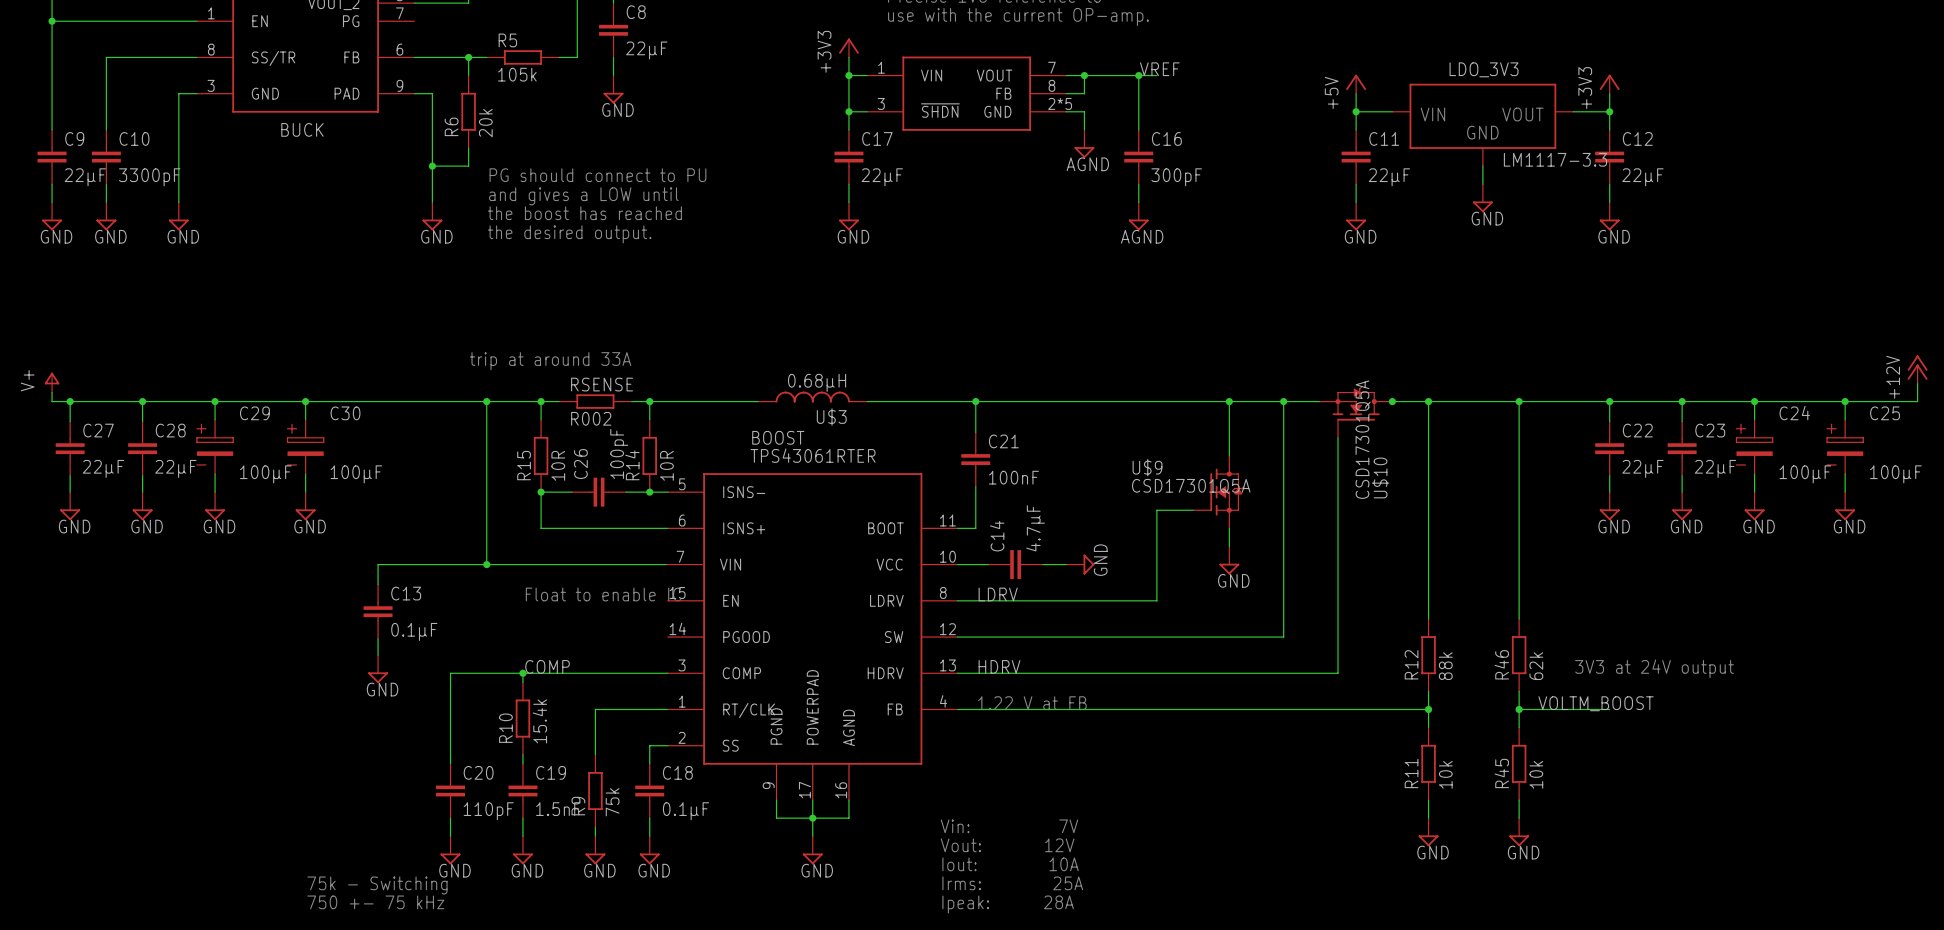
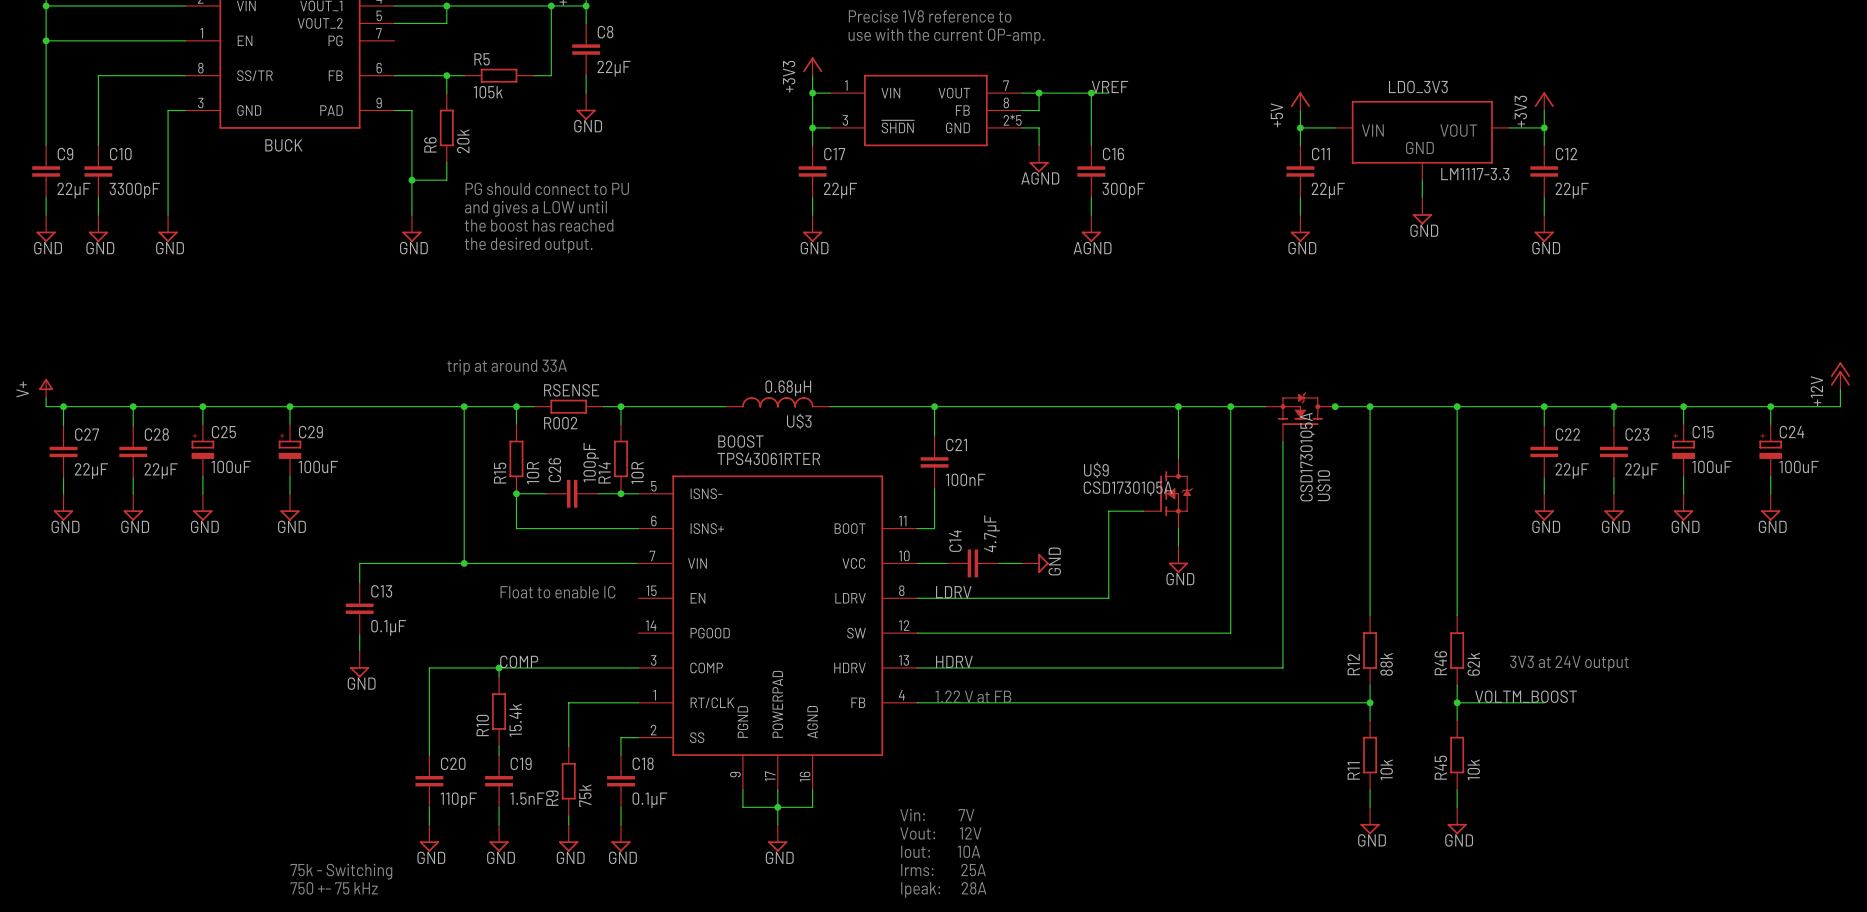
C29 name position: C29 (254, 413) -> C29 (310, 432)
C24 name position: C24 (1794, 413) -> C24 (1791, 432)
C25 name position: C25 (1885, 413) -> C25 (223, 432)
C29 symbol: [196, 419, 234, 475] -> [278, 424, 302, 477]
C24 symbol: [1736, 419, 1774, 475] -> [1759, 424, 1783, 477]
C25 symbol: [1826, 419, 1864, 475] -> [191, 424, 215, 477]
C30: 100µF (305, 446) -> none
C15: none -> 100uF (1683, 450)
C29 value: 100µF (265, 474) -> 100uF (318, 466)
C24 value: 100µF (1805, 474) -> 100uF (1799, 466)
C25 value: 100µF (1895, 474) -> 100uF (231, 466)

